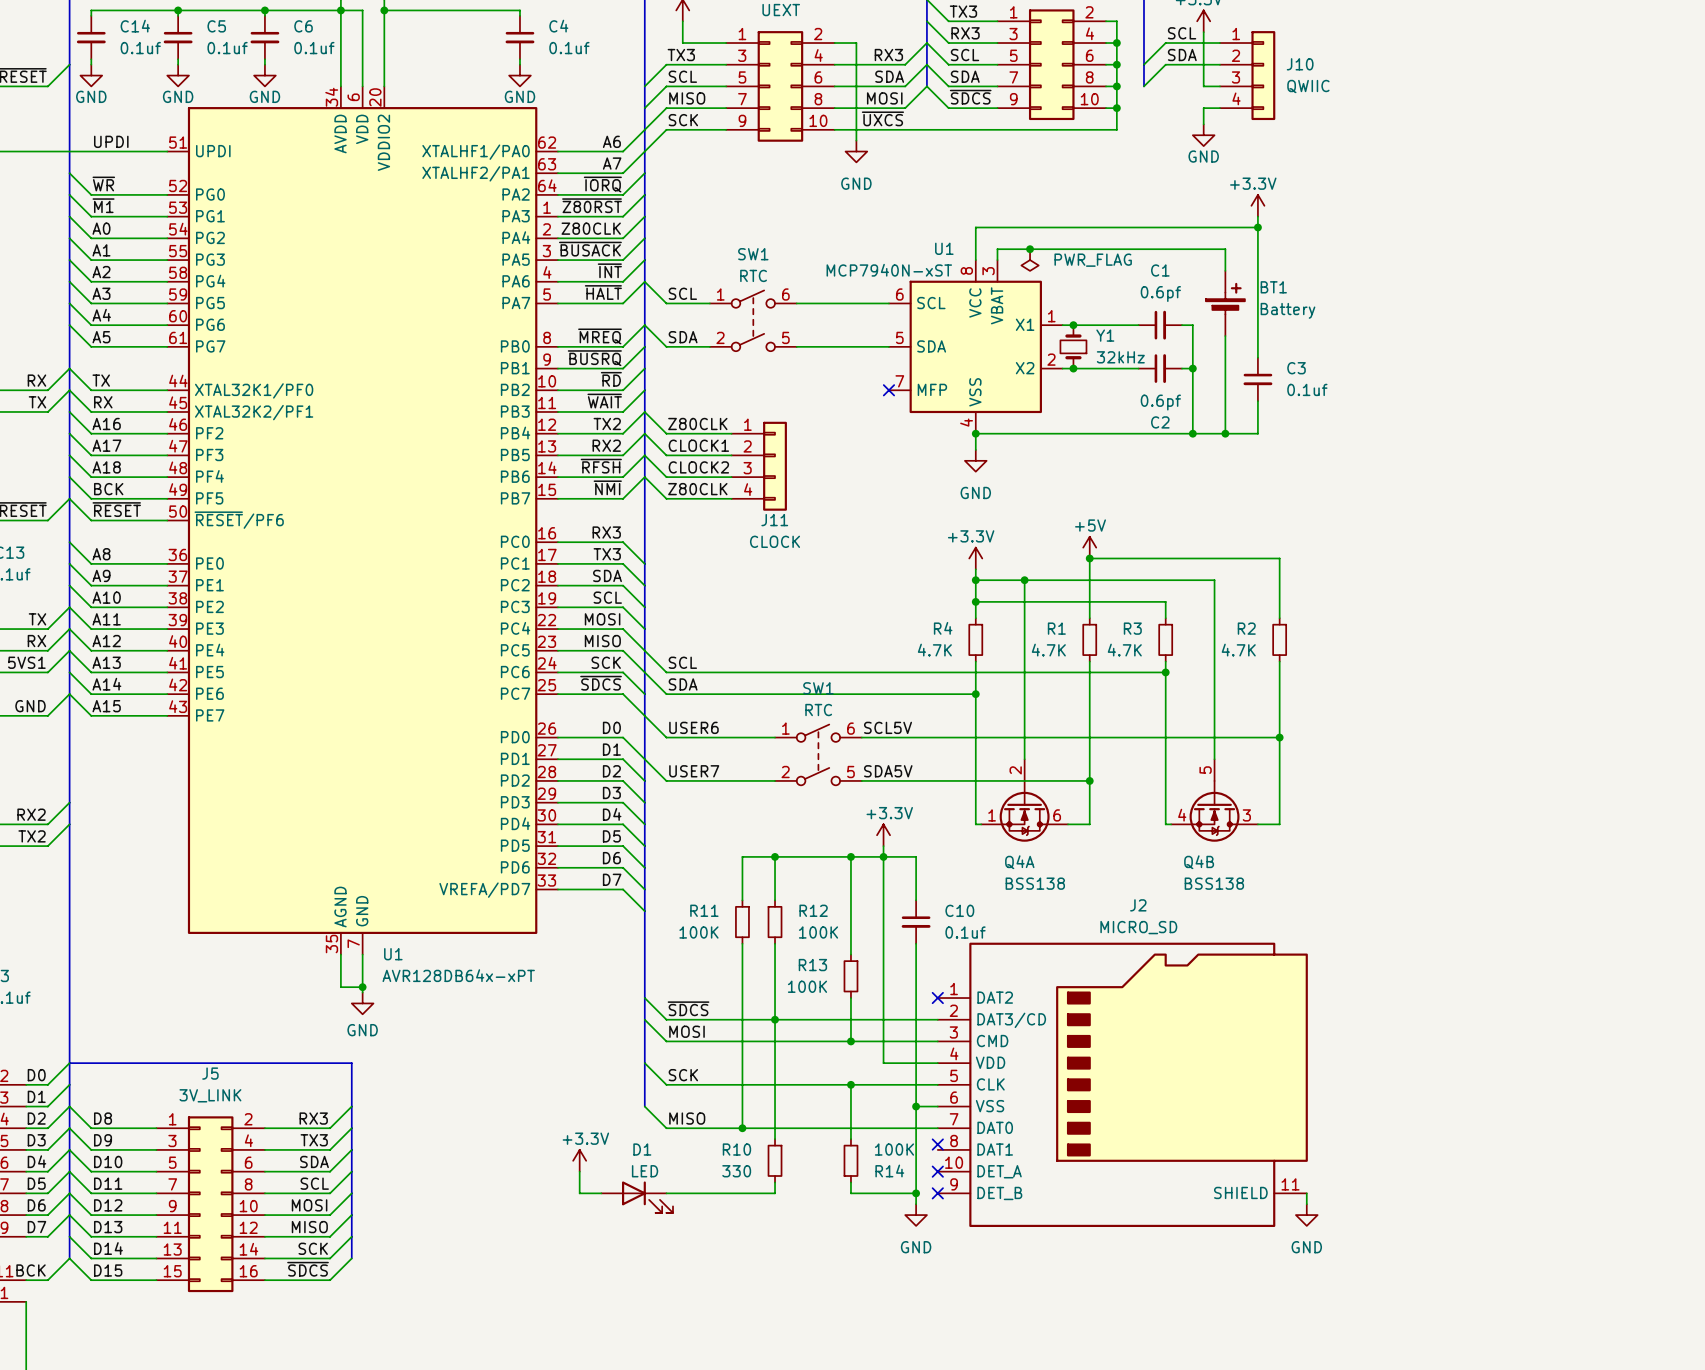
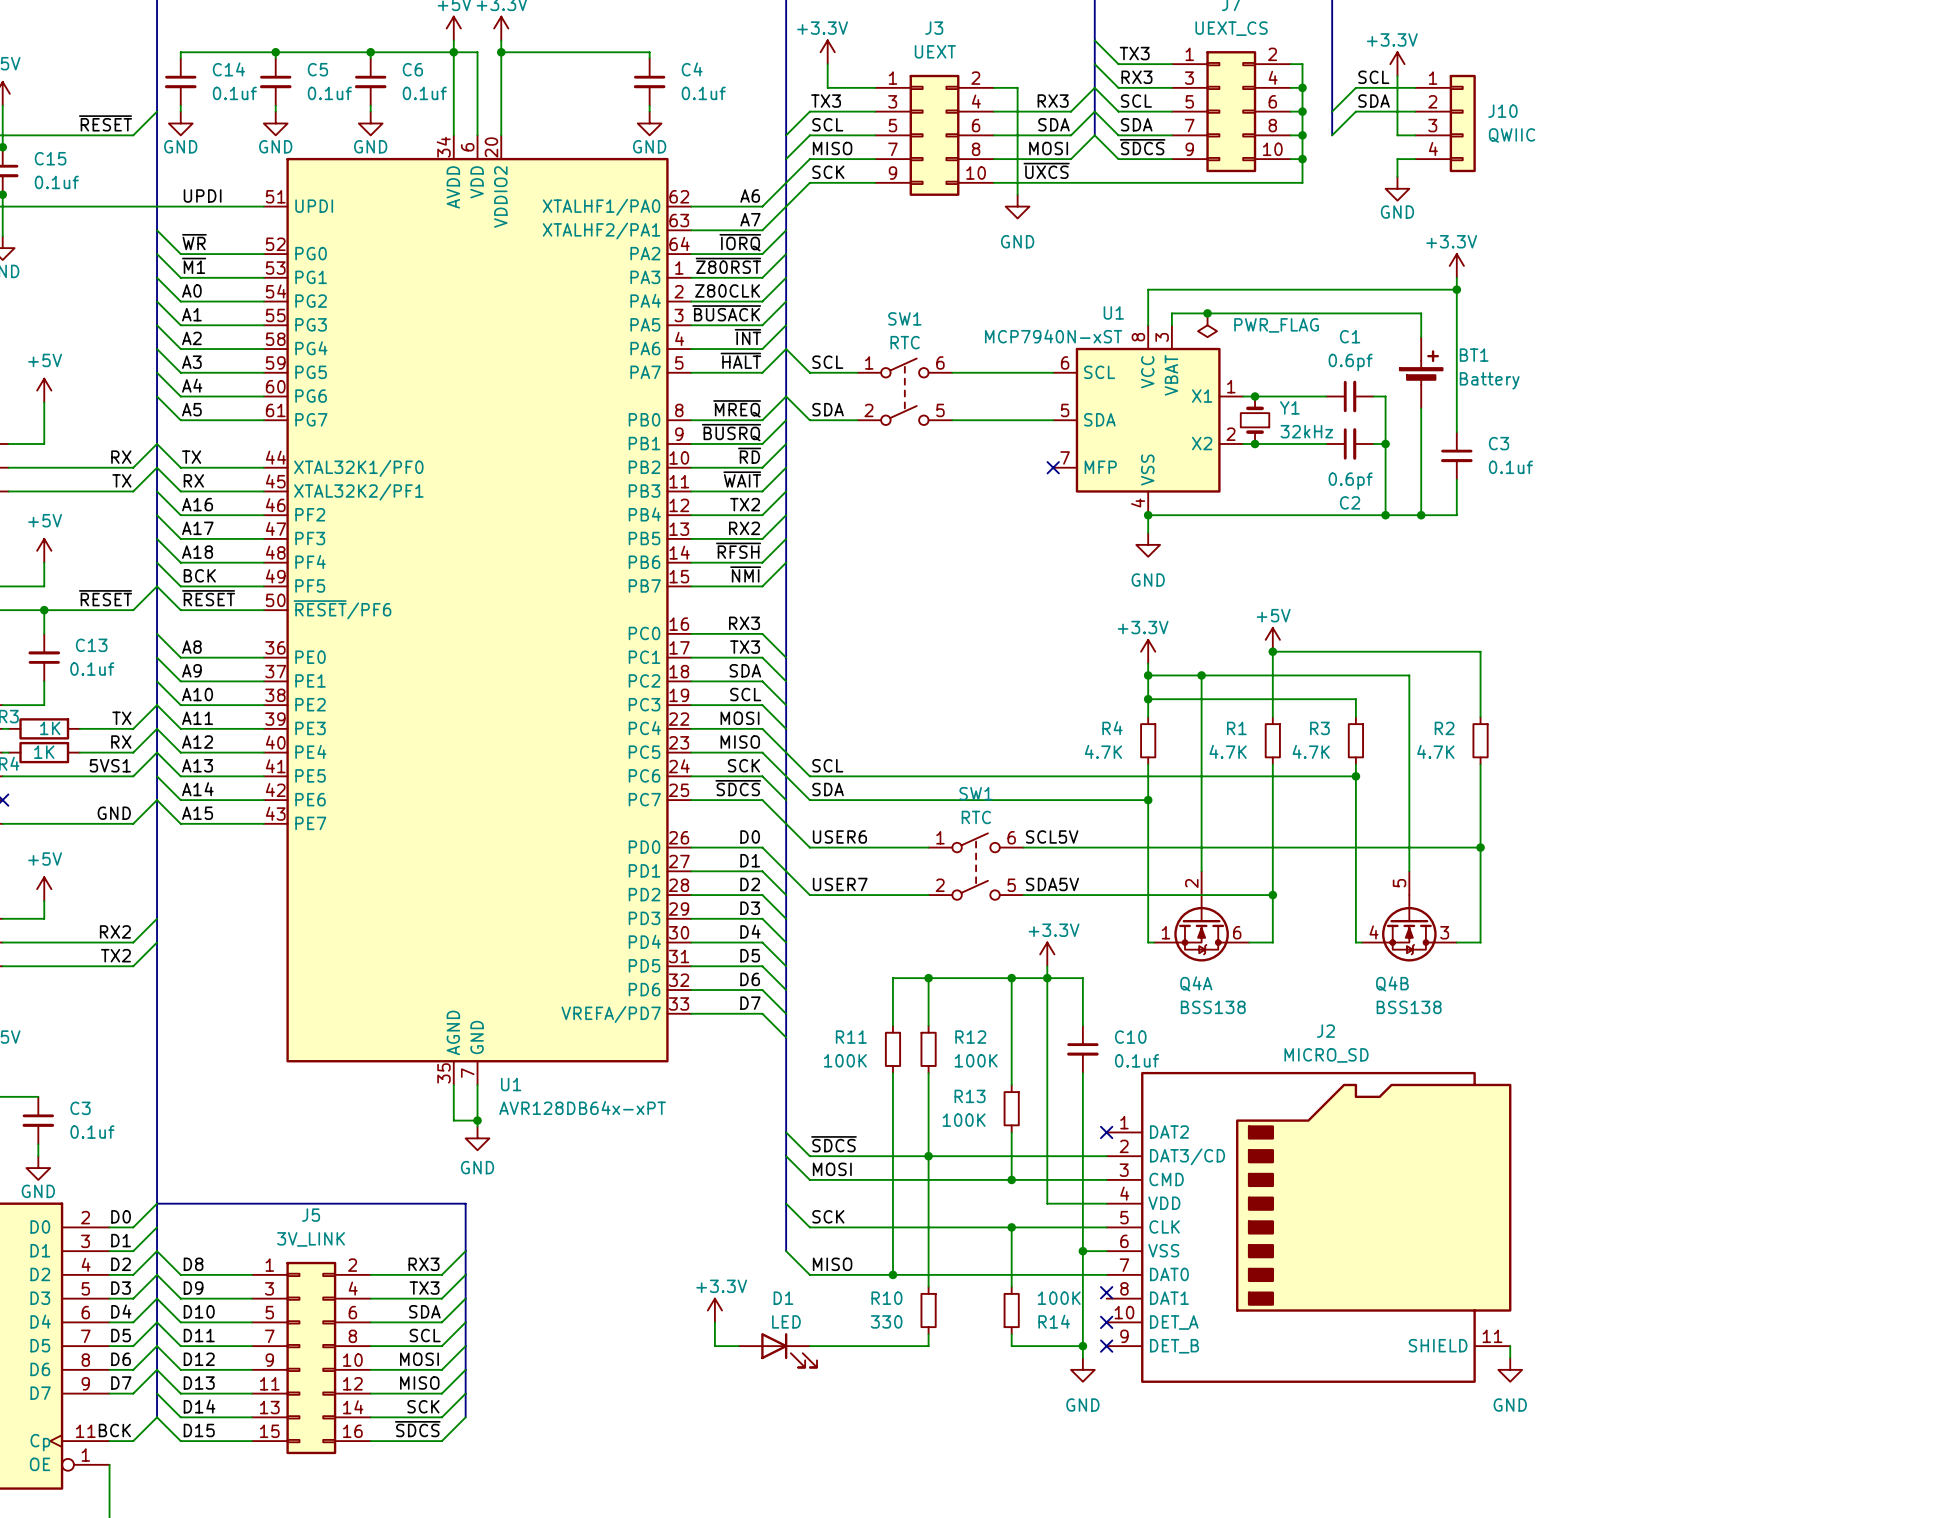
wire: (644, 411) (666, 433) (731, 433) -> none
label: Z80CLK (697, 424) -> none
wire: (644, 433) (666, 455) (731, 455) -> none
label: CLOCK1 (698, 445) -> none
wire: (644, 455) (666, 477) (731, 477) -> none
J11: CLOCK (759, 466) -> none
label: CLOCK2 (698, 467) -> none
wire: (644, 477) (666, 498) (731, 498) -> none
label: Z80CLK (697, 489) -> none

